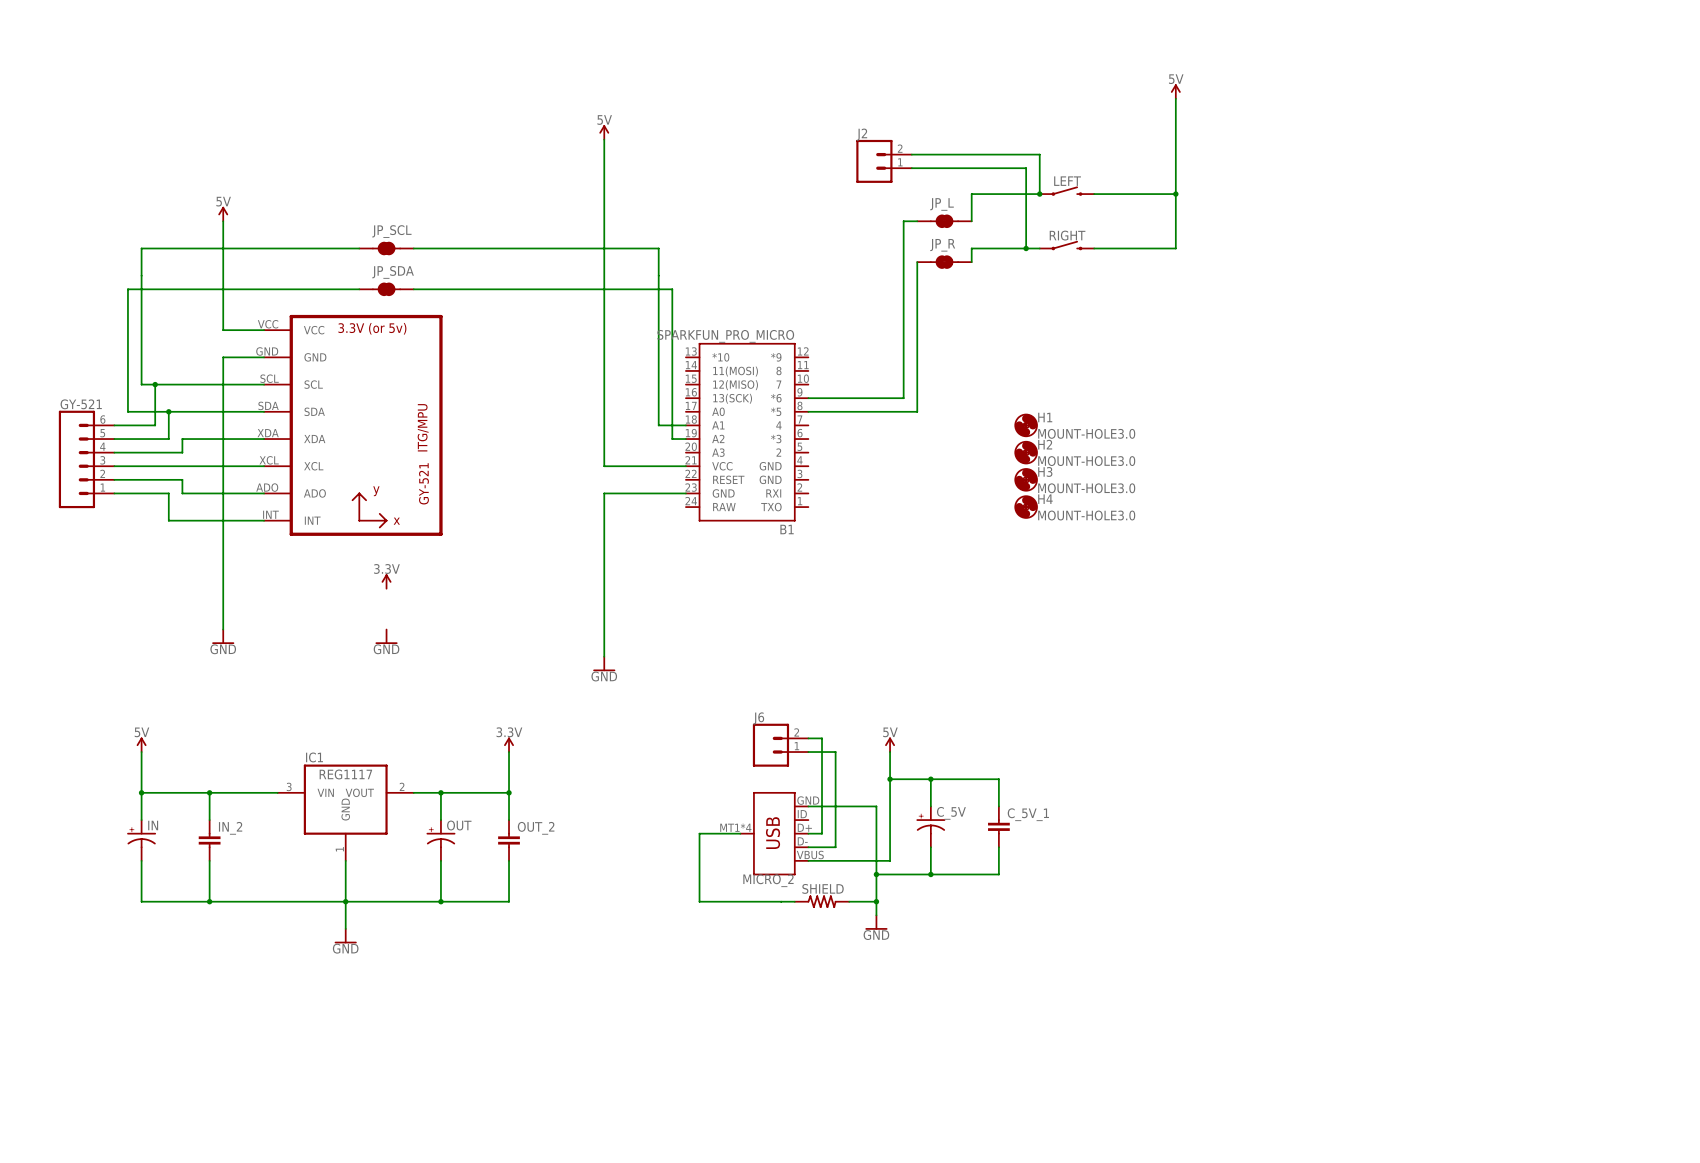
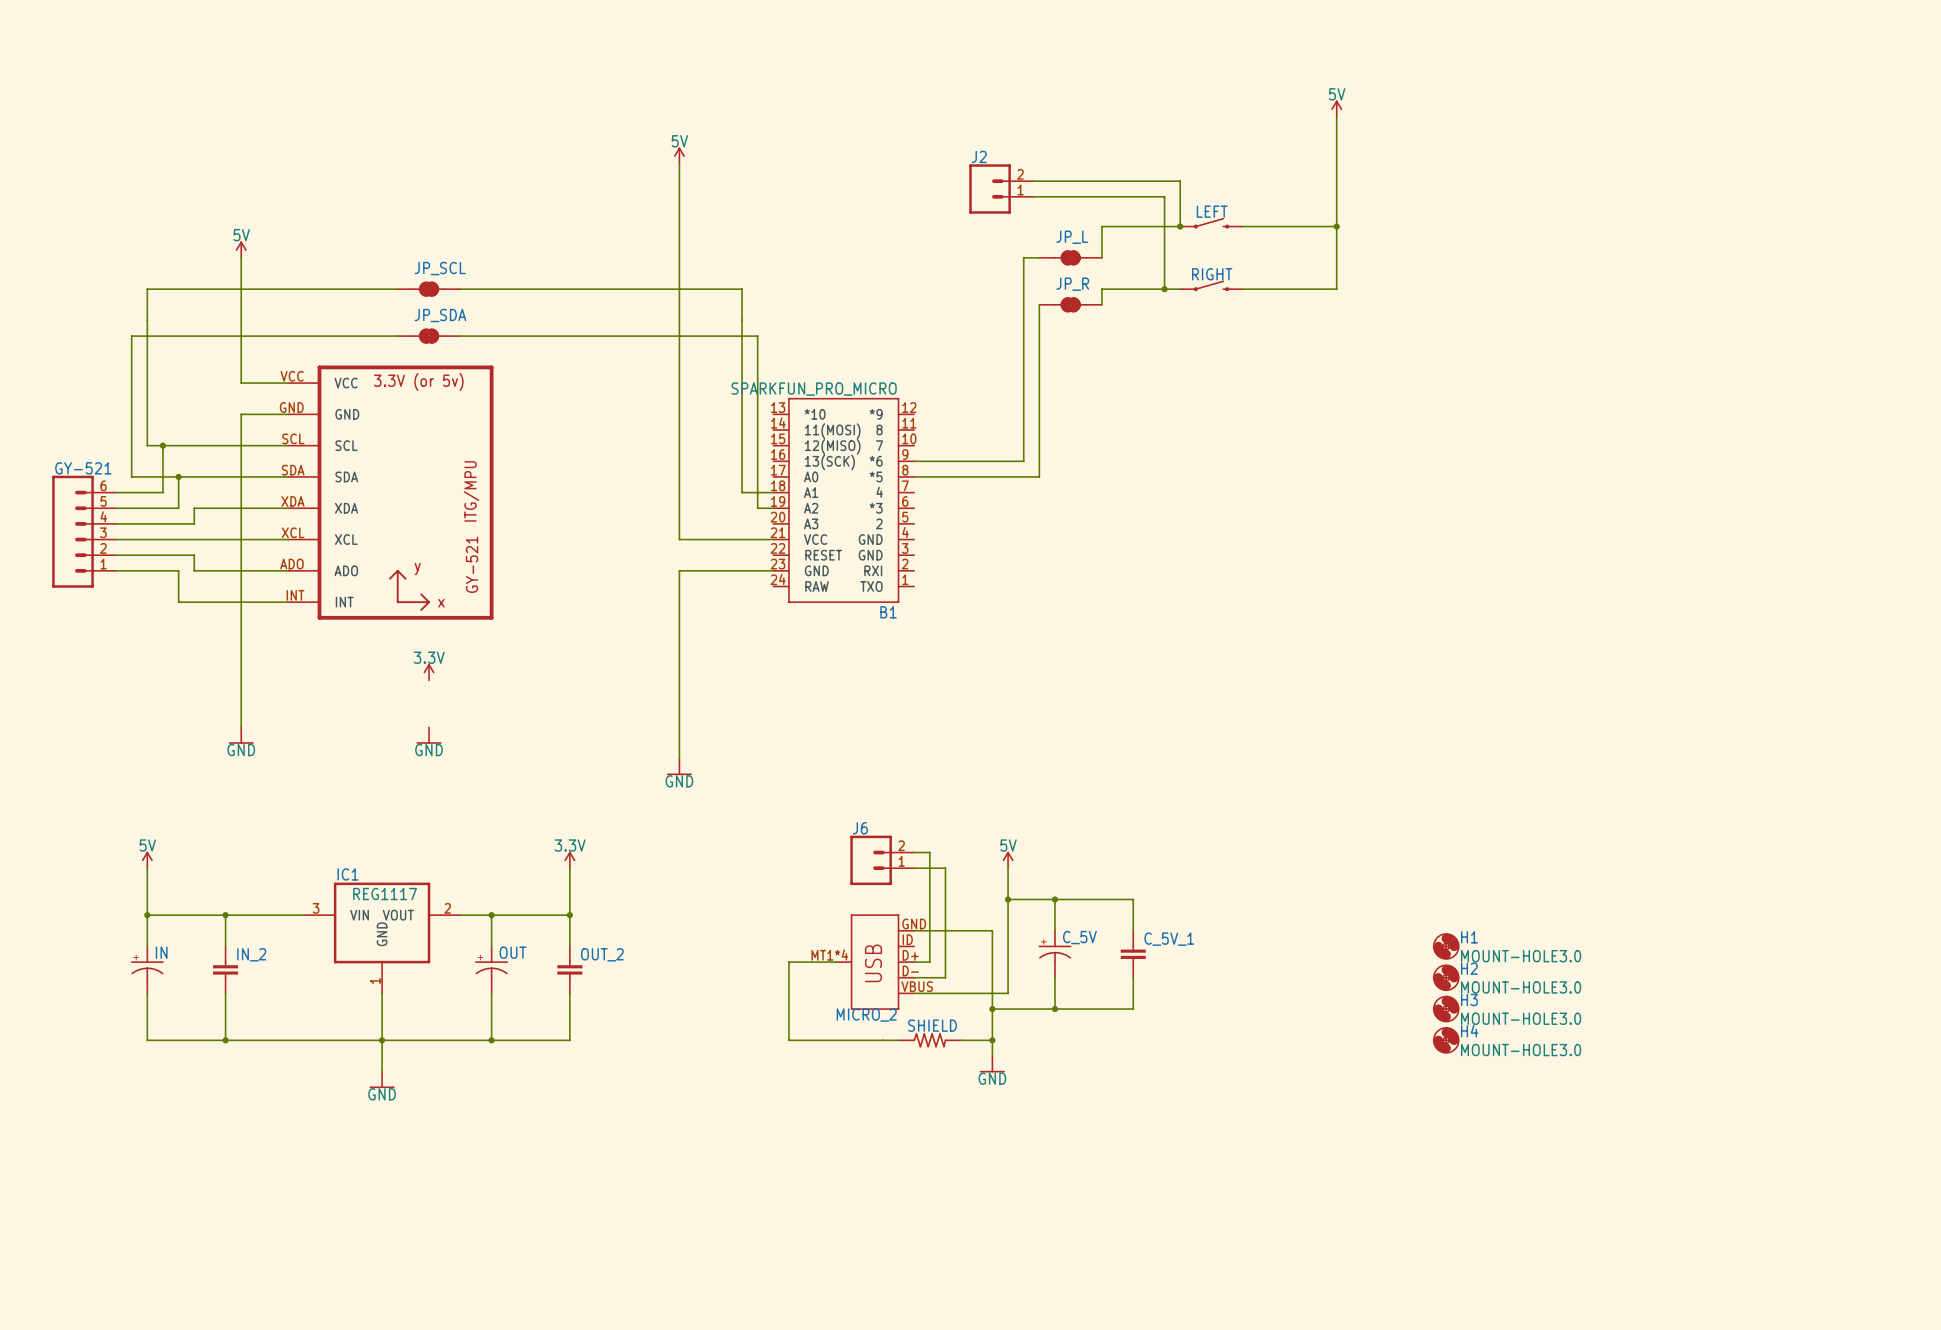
H1 position: (1026, 425) -> (1446, 946)
H2 position: (1026, 452) -> (1446, 977)
H3 position: (1026, 479) -> (1446, 1009)
H4 position: (1026, 507) -> (1446, 1040)

